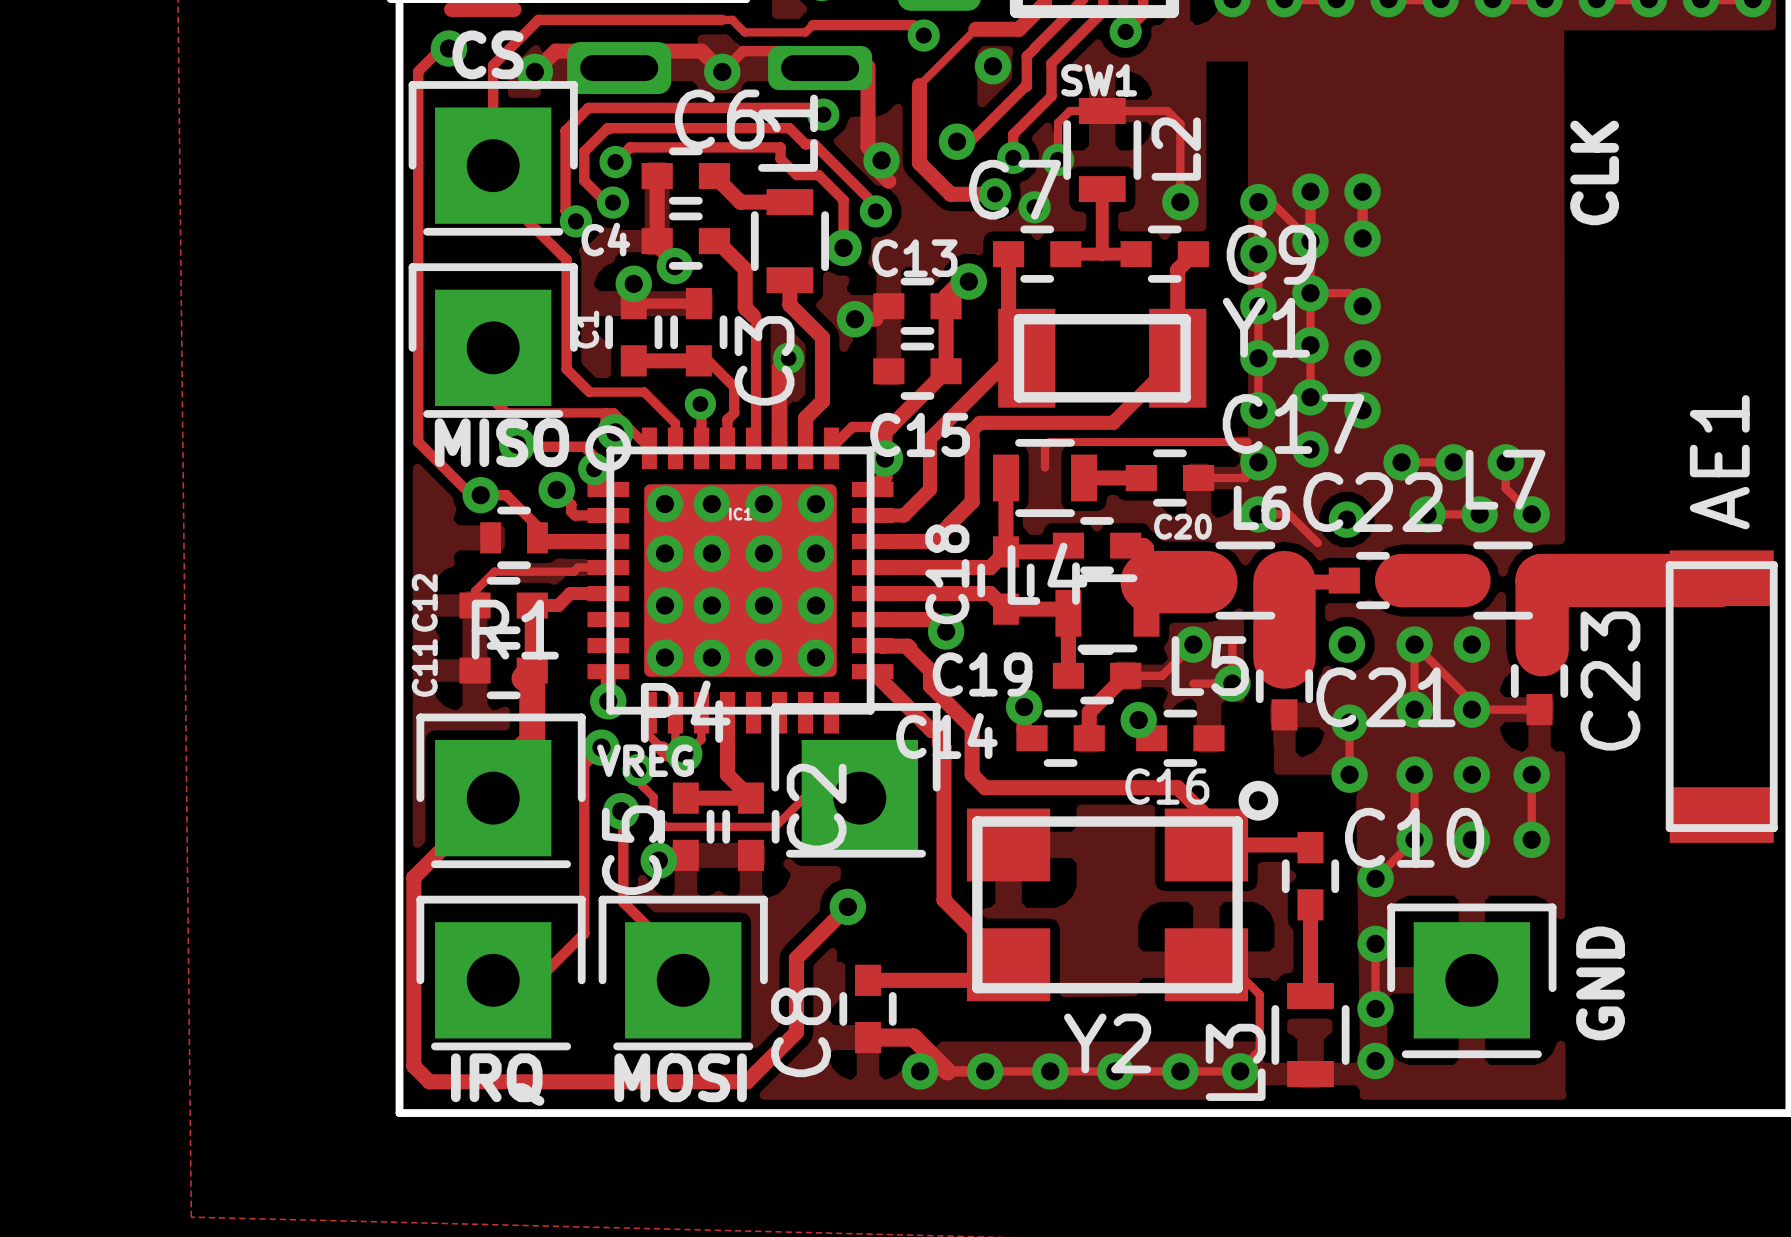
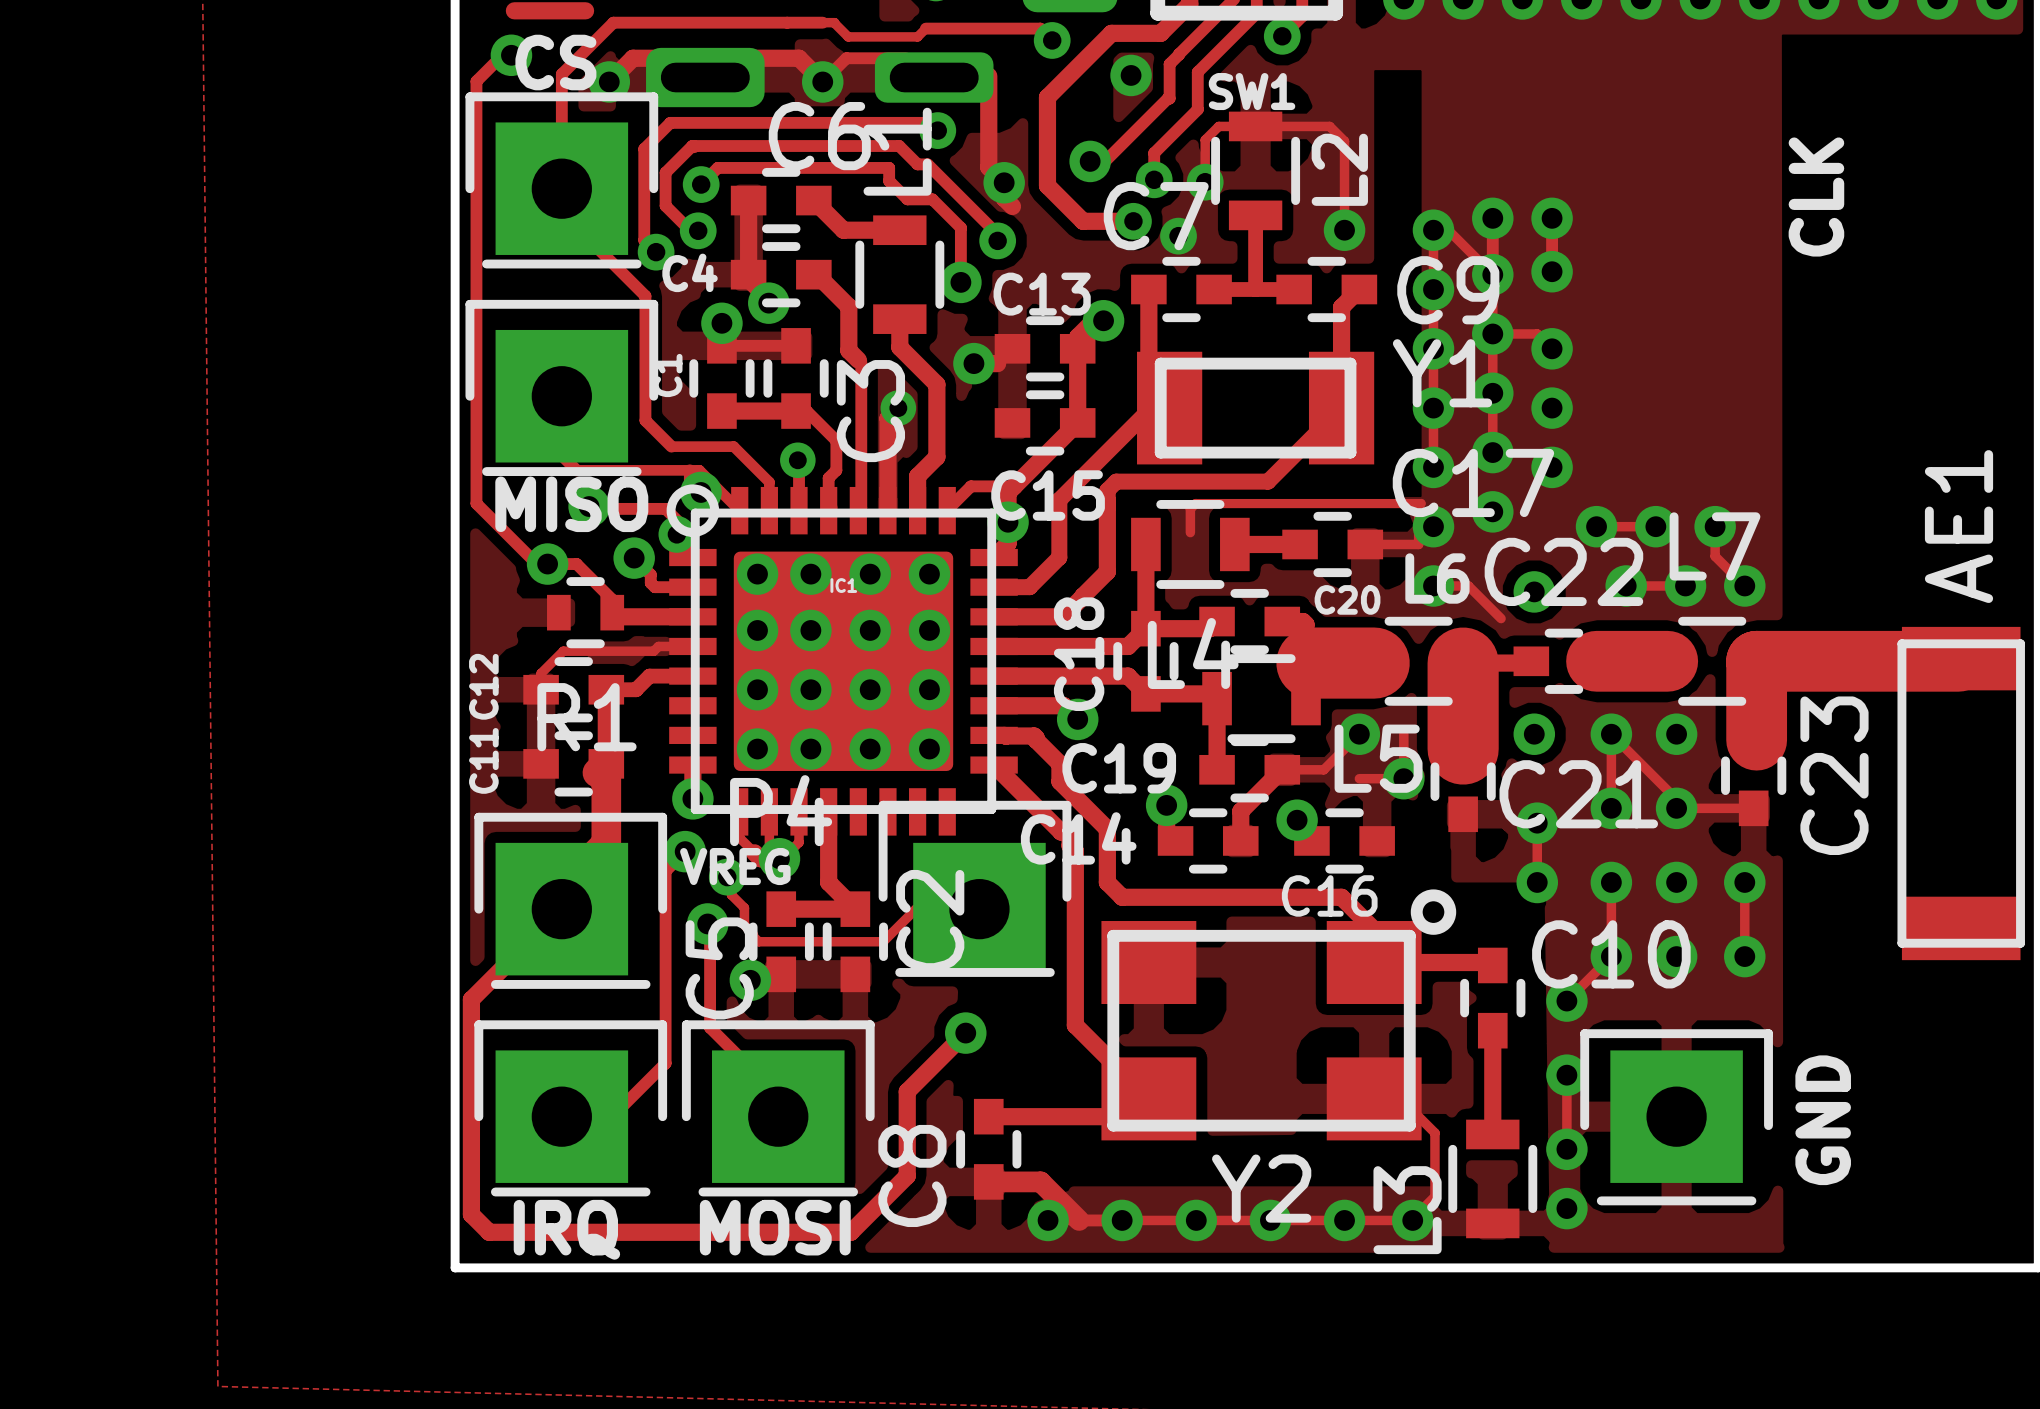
track width: thin (975, 29) (919, 85) -> thick (1111, 33) (1047, 97)

